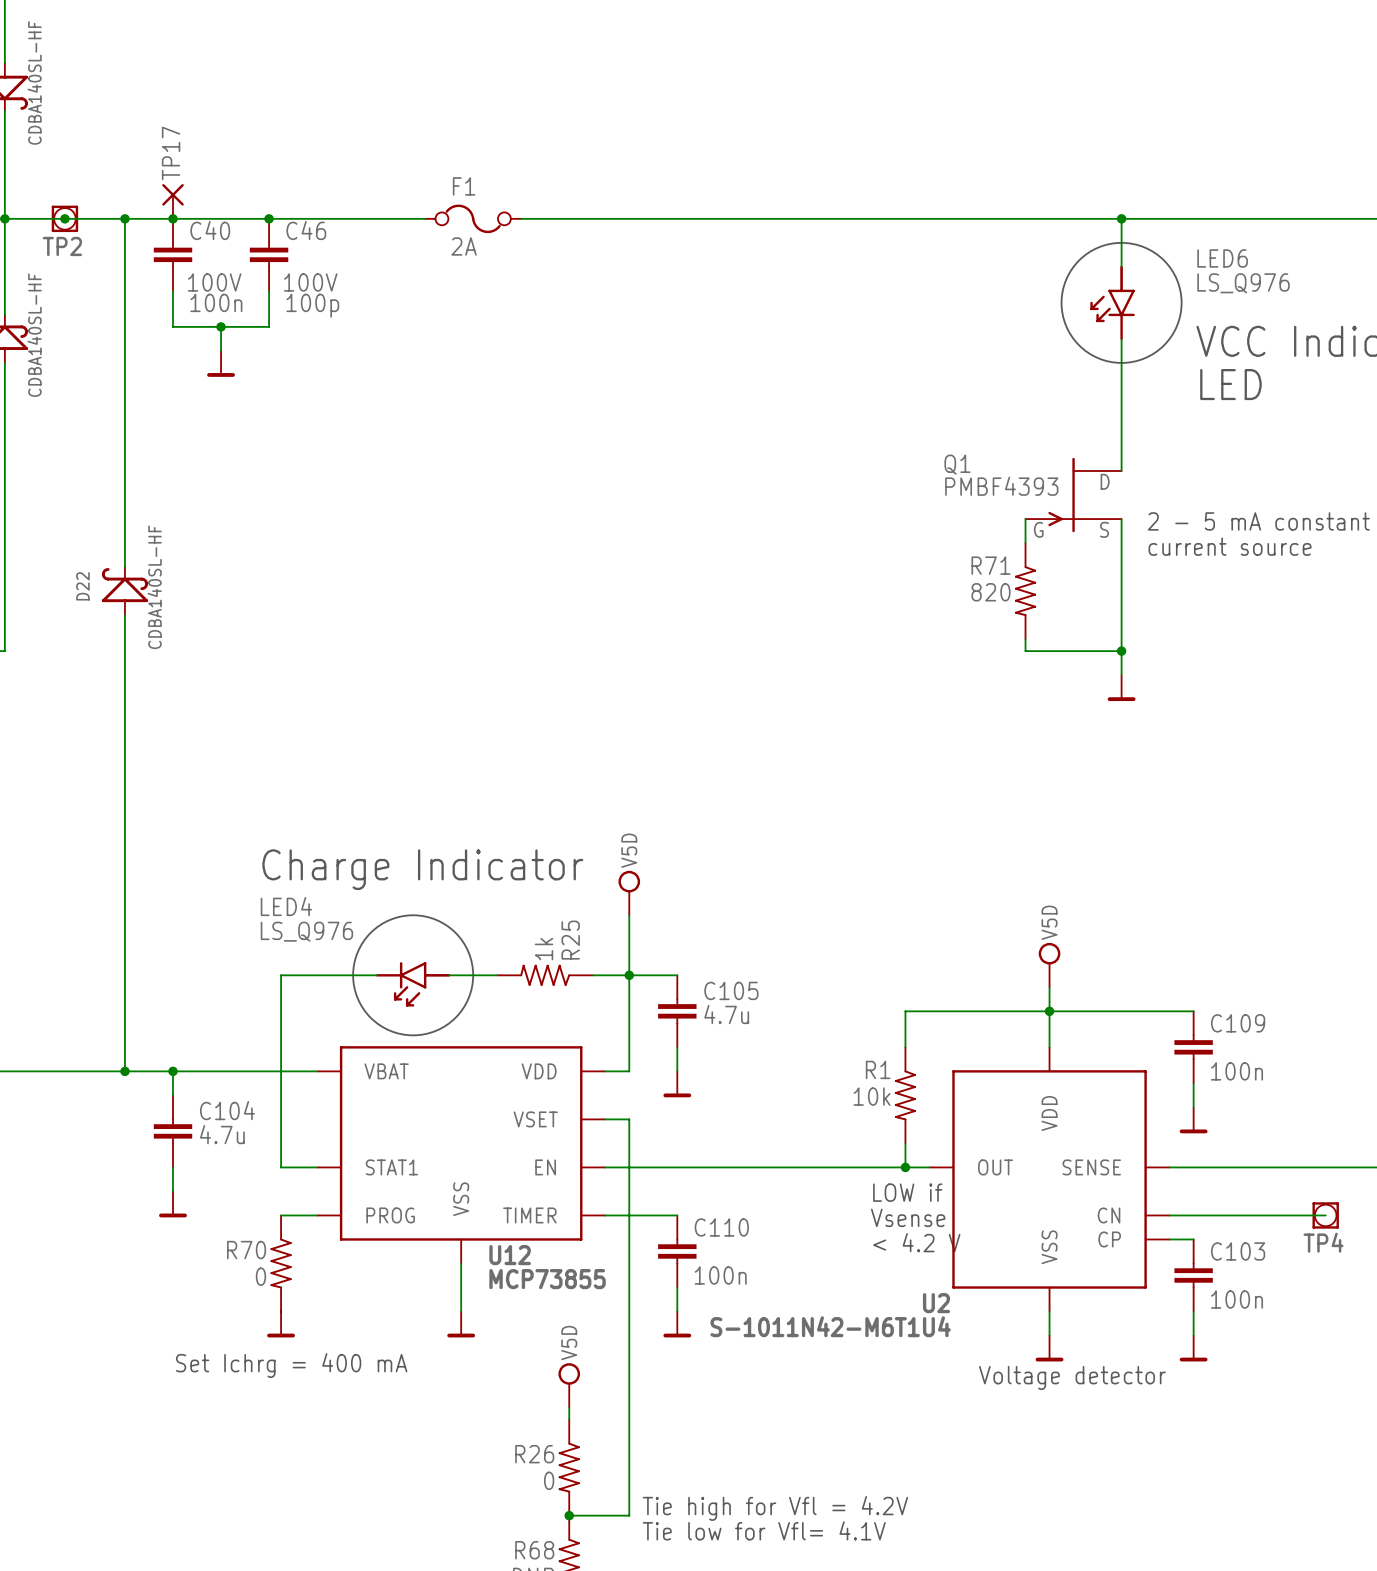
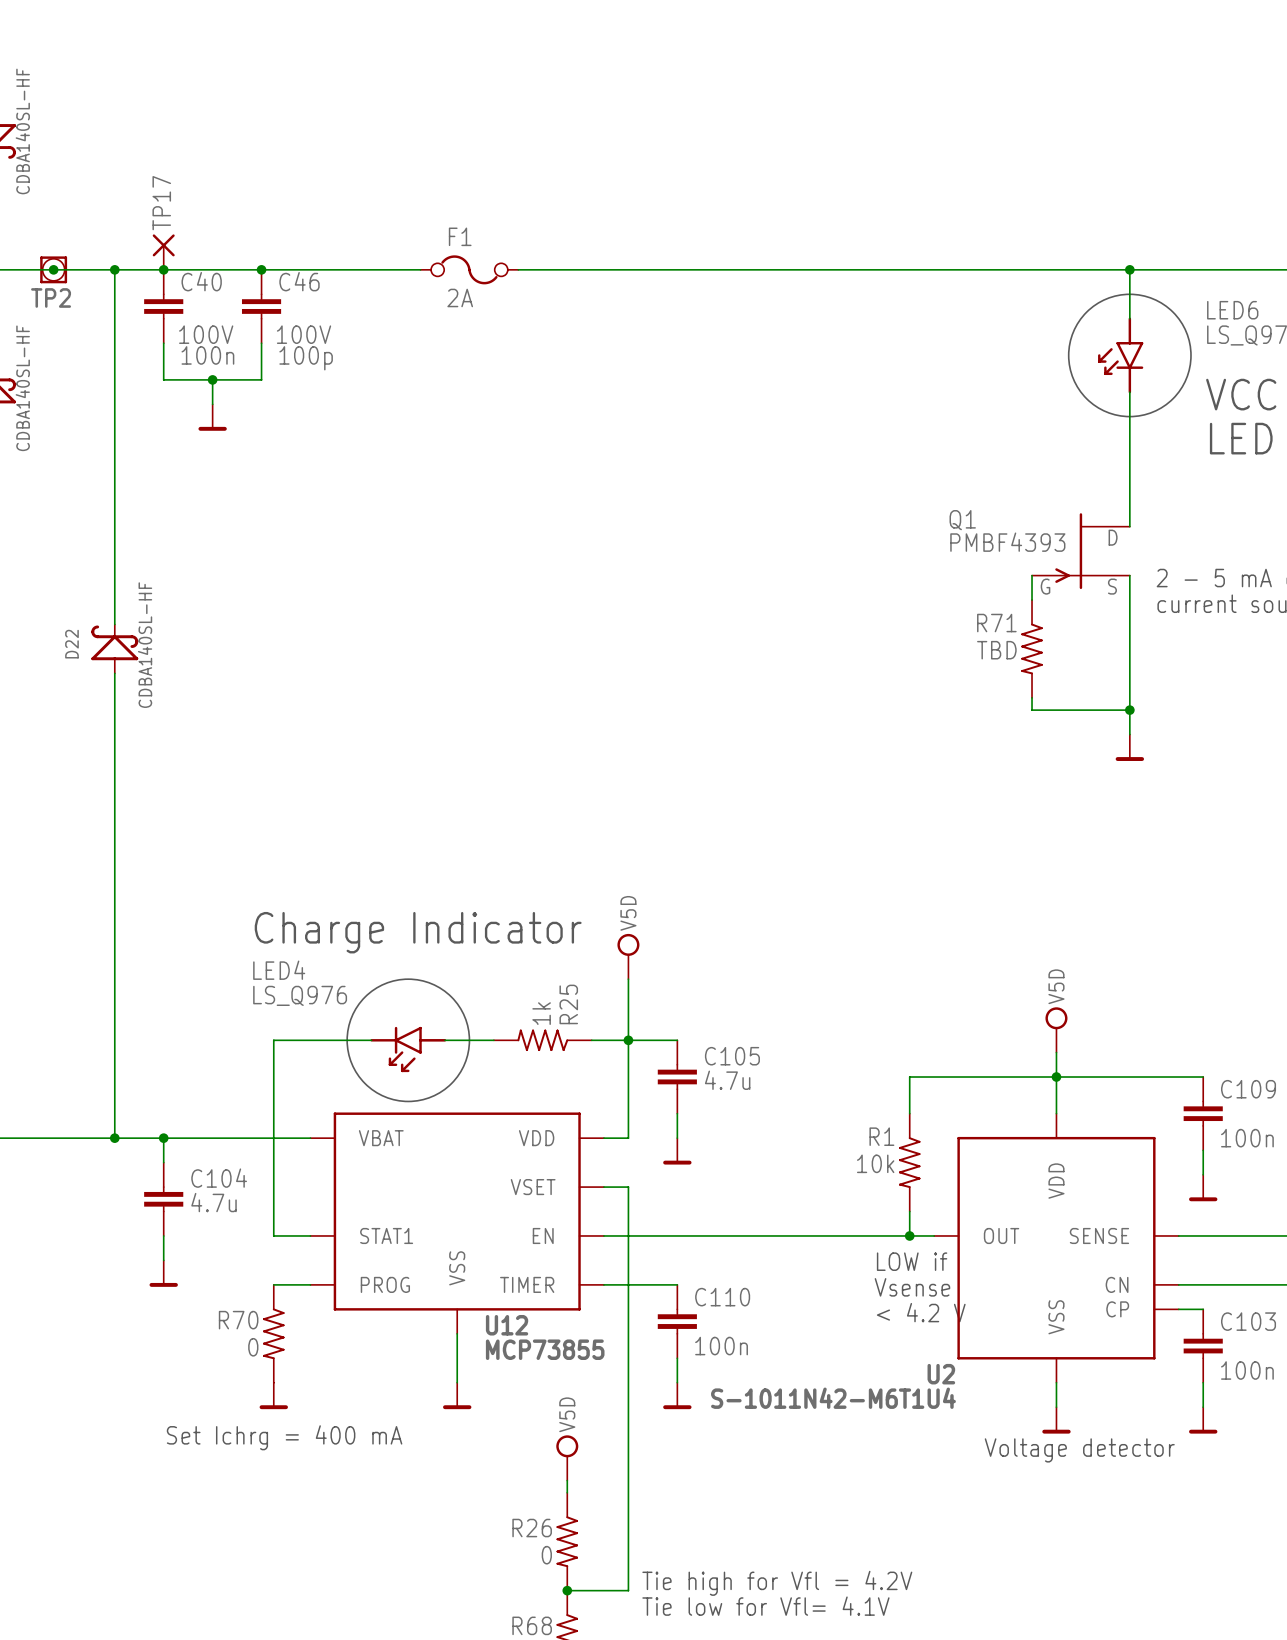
R71 value: 820 (991, 592) -> TBD (996, 650)

